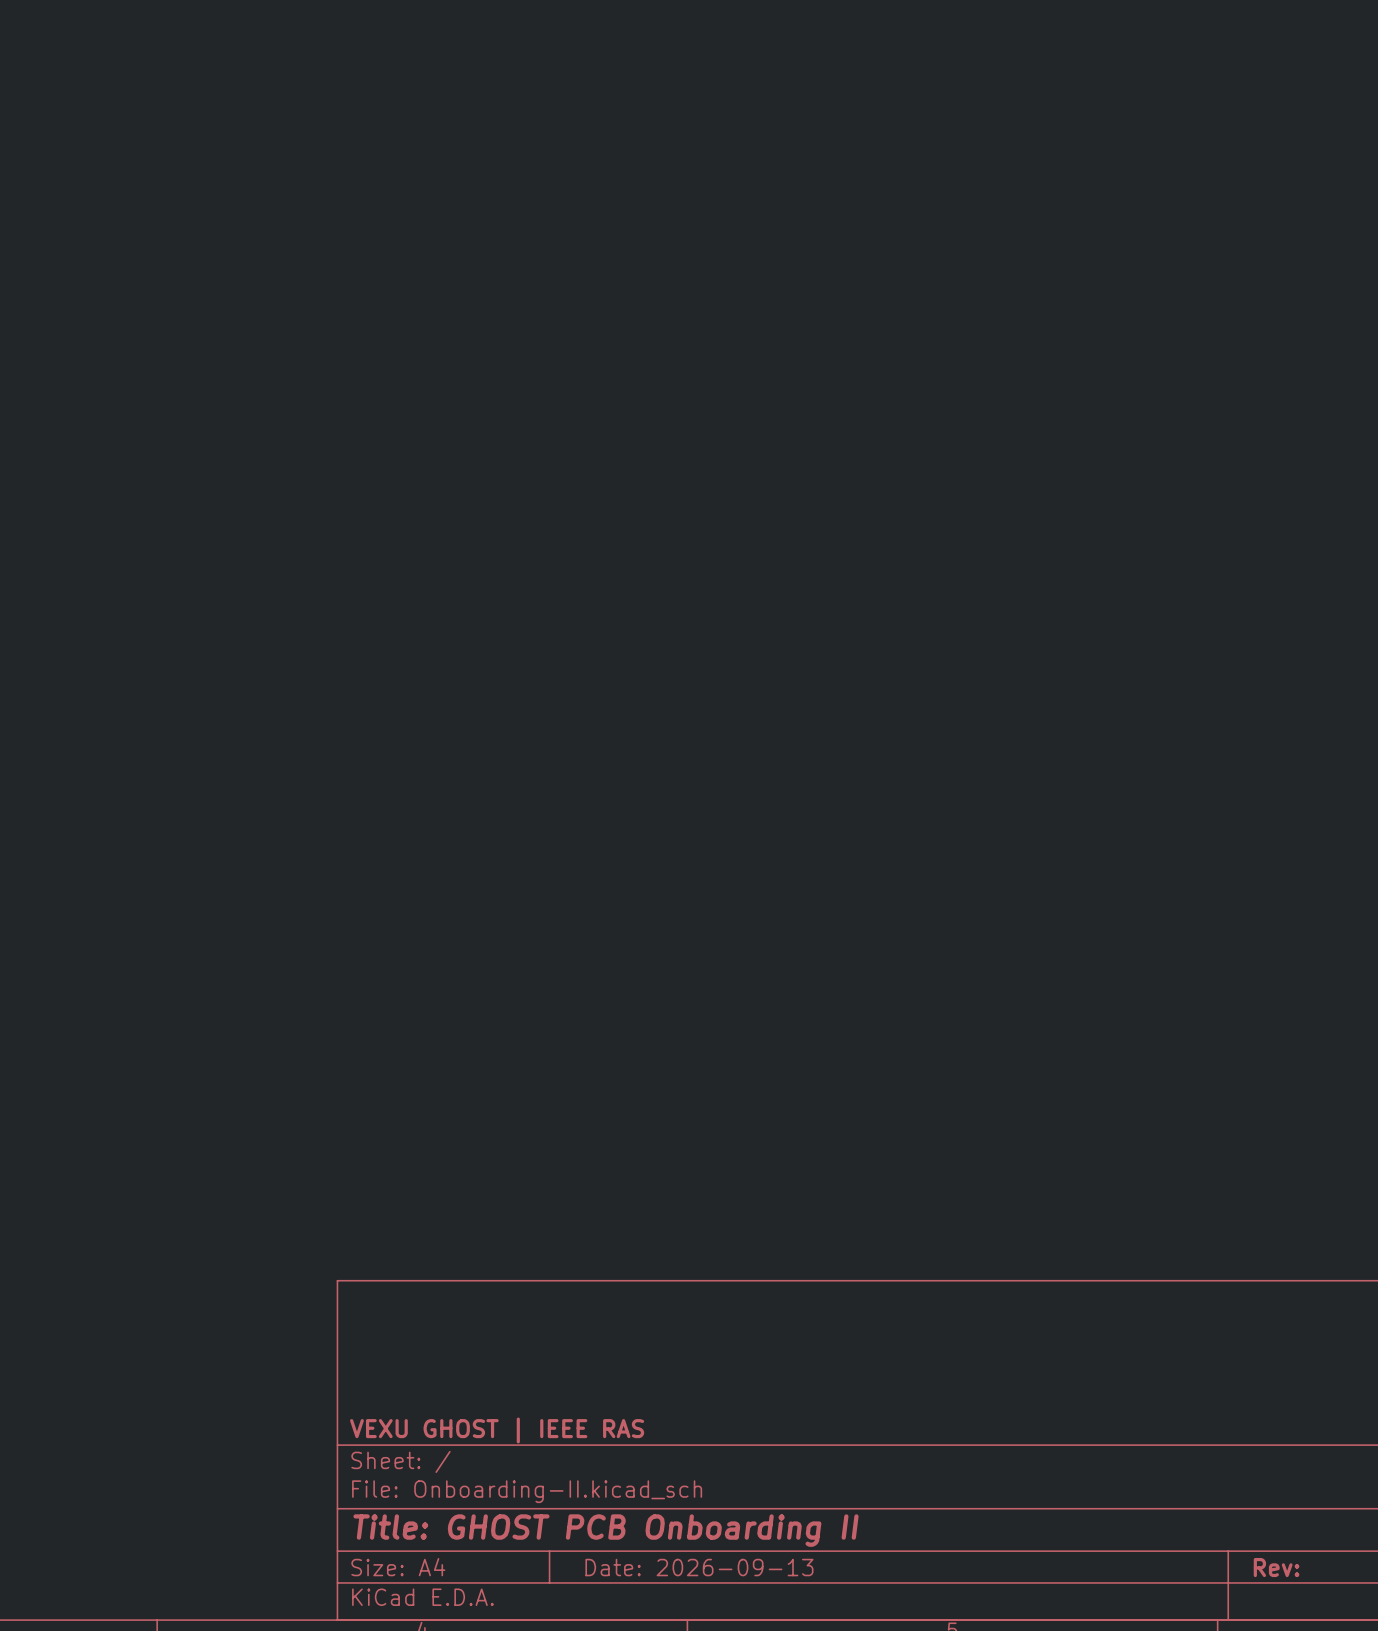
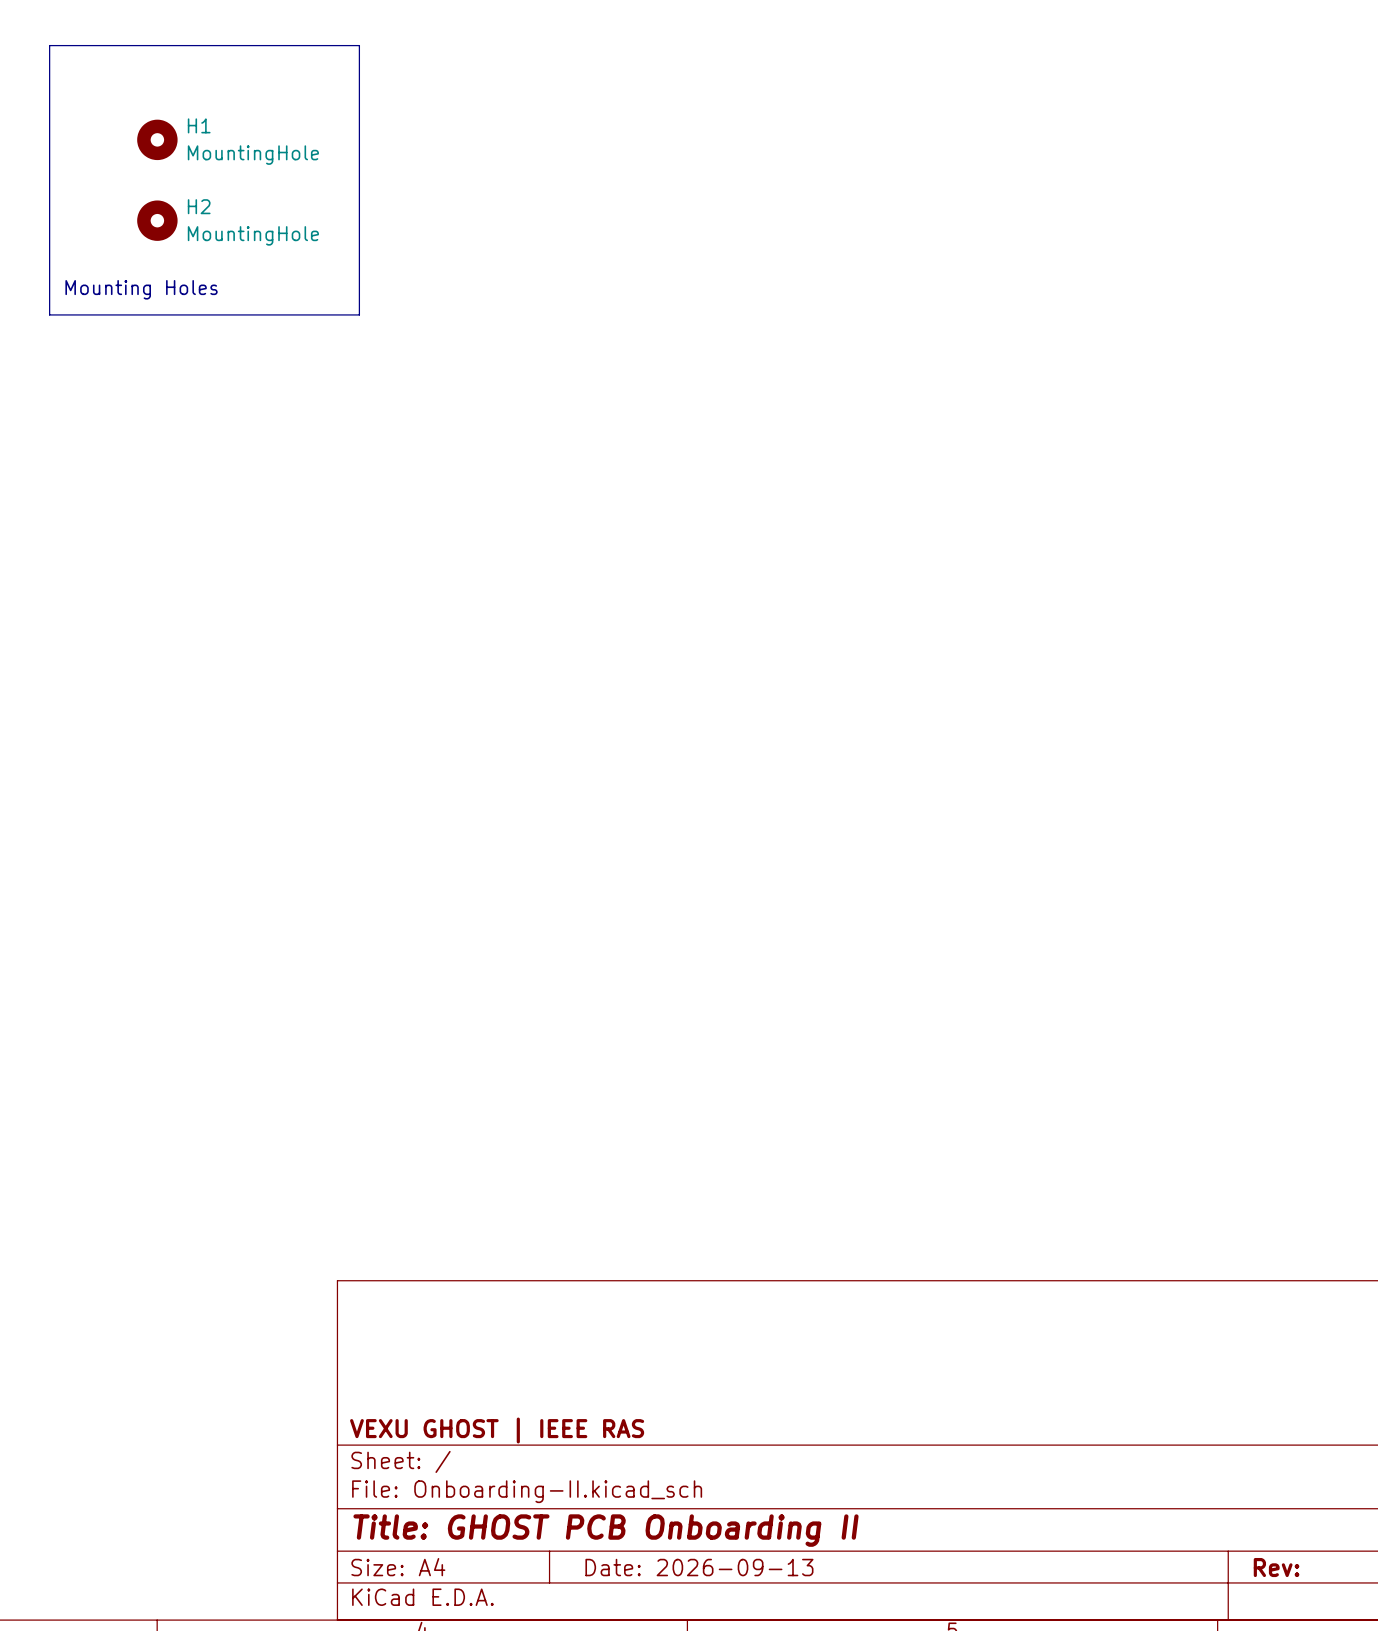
line: none -> (49, 45) (359, 45) (359, 314) (49, 314) (49, 45)
H1: none -> MountingHole (157, 139)
H2: none -> MountingHole (157, 220)
text: none -> Mounting Holes (141, 289)

